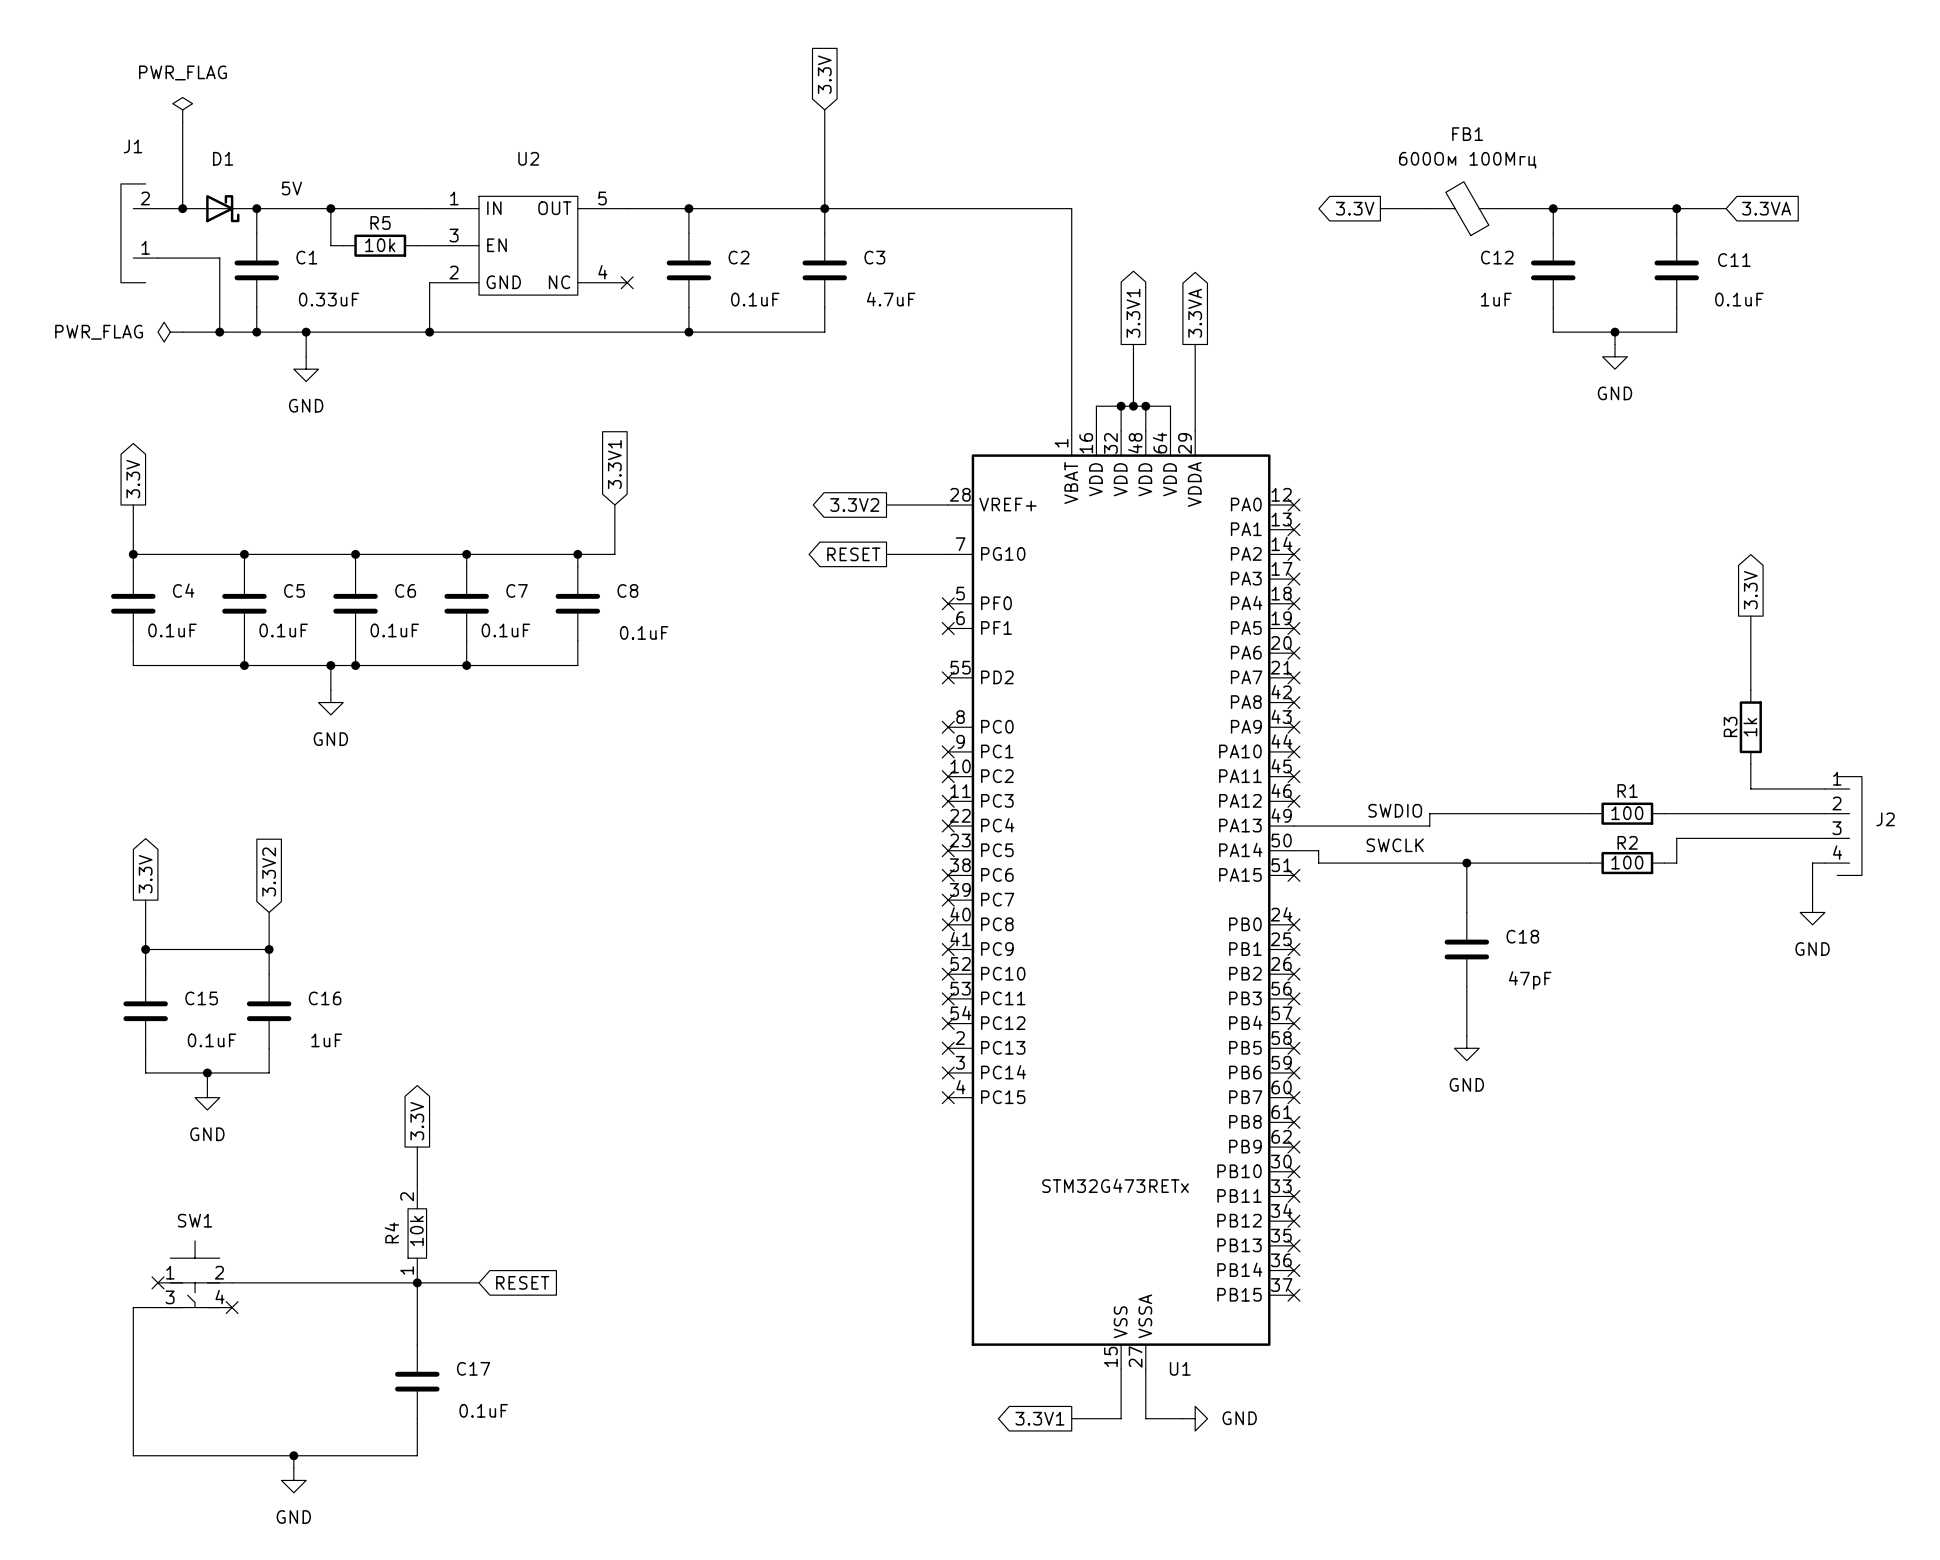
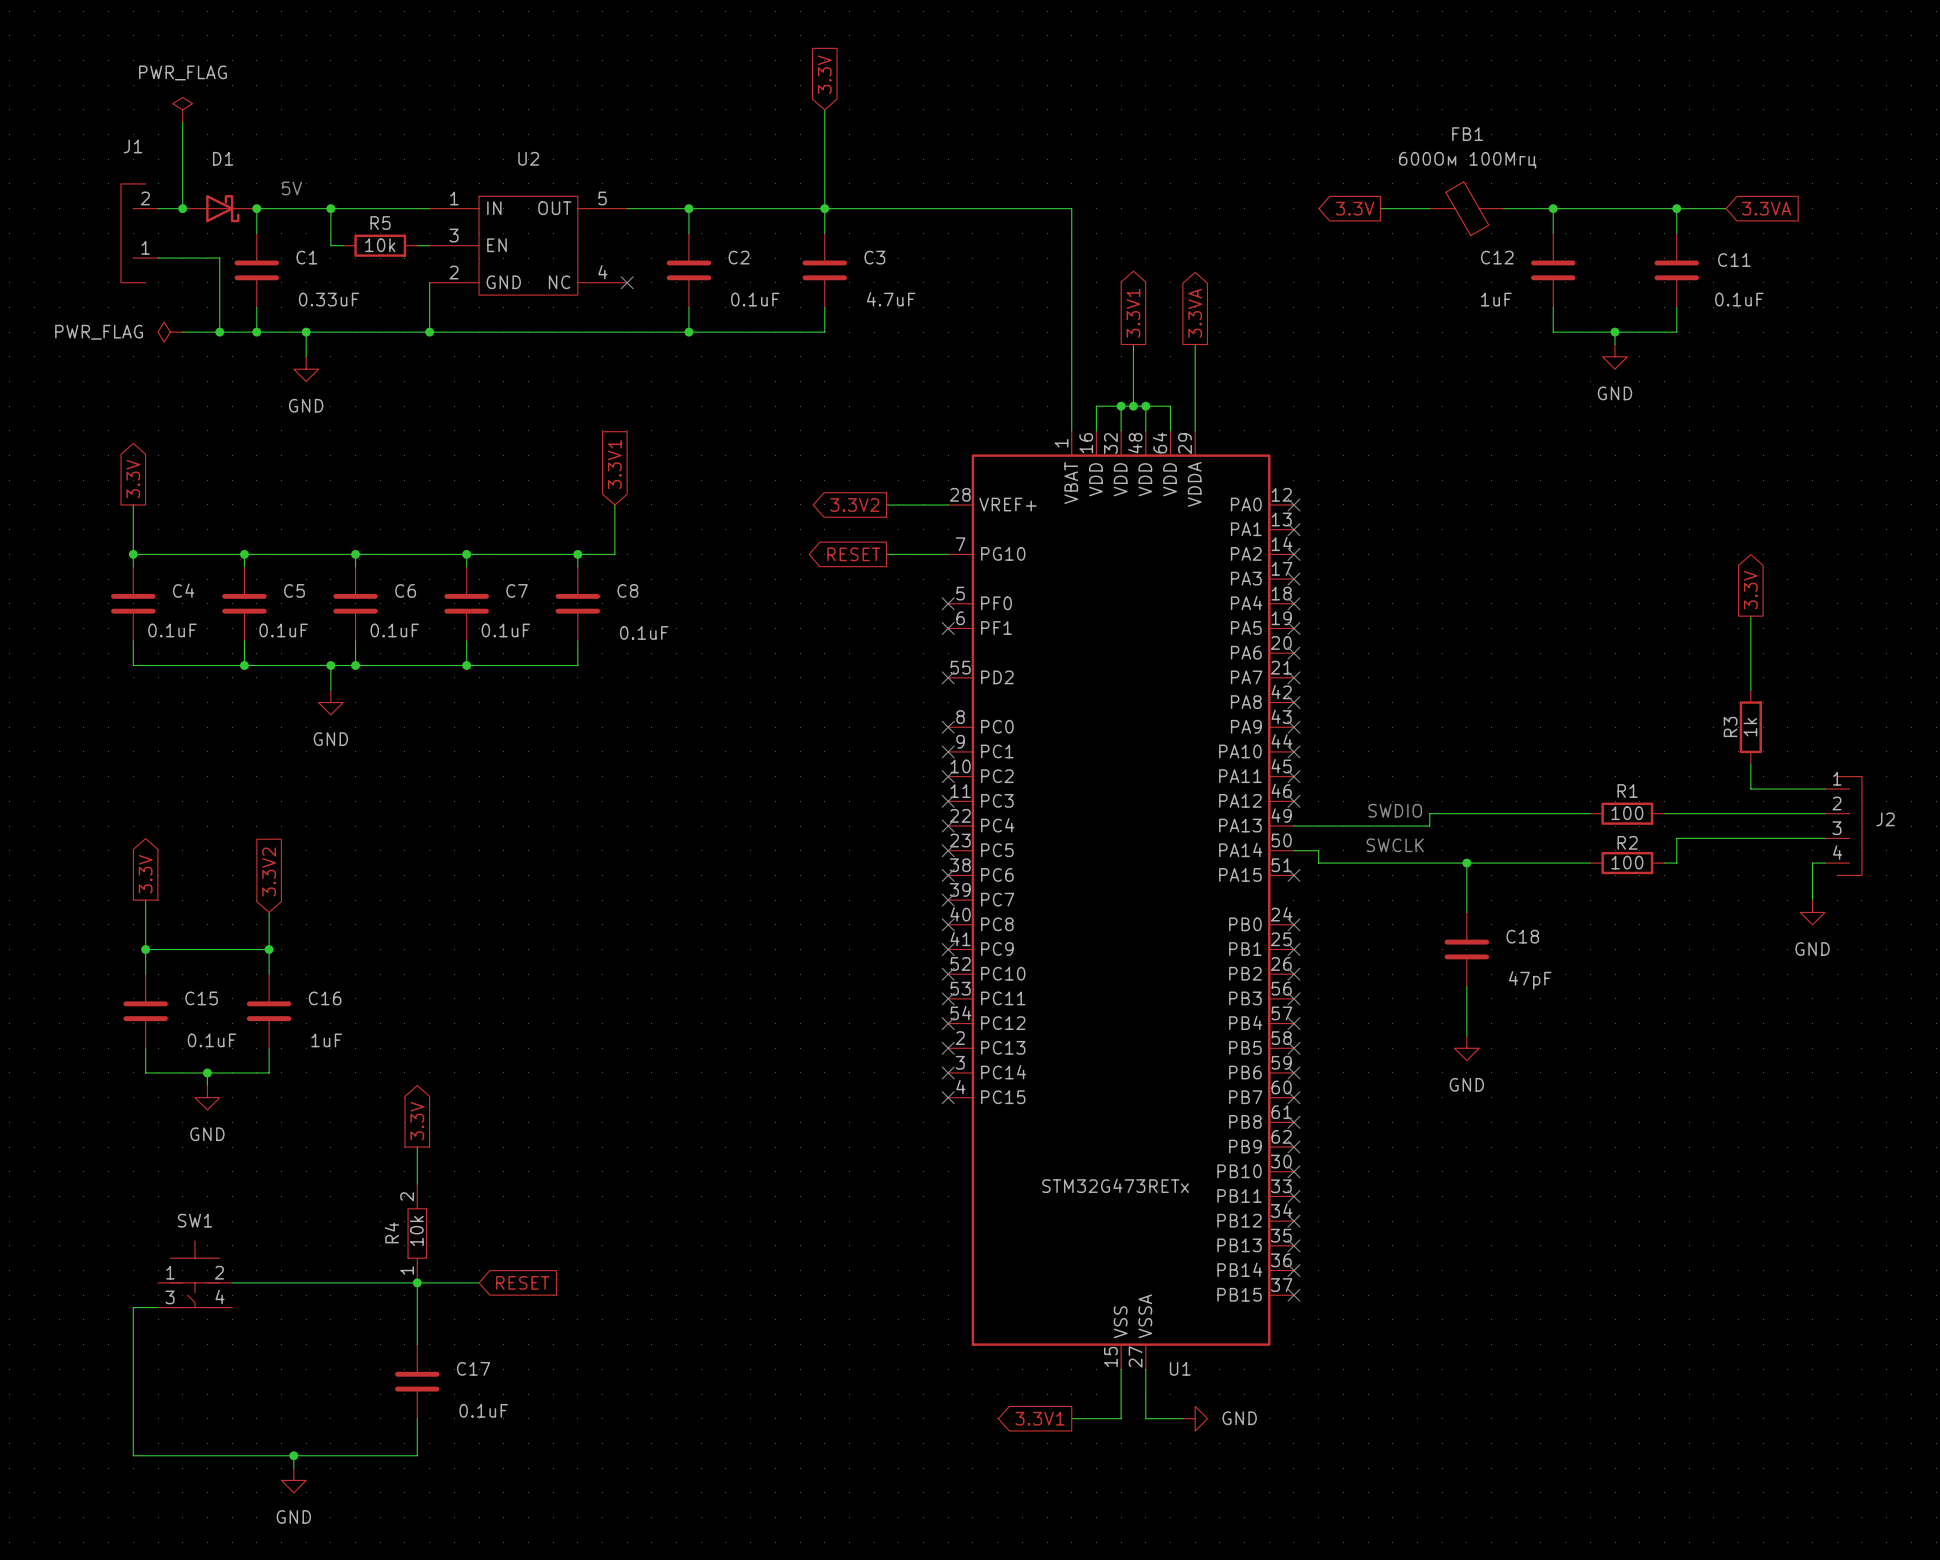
no-connect mark: (158, 1282) -> none
no-connect mark: (232, 1307) -> none

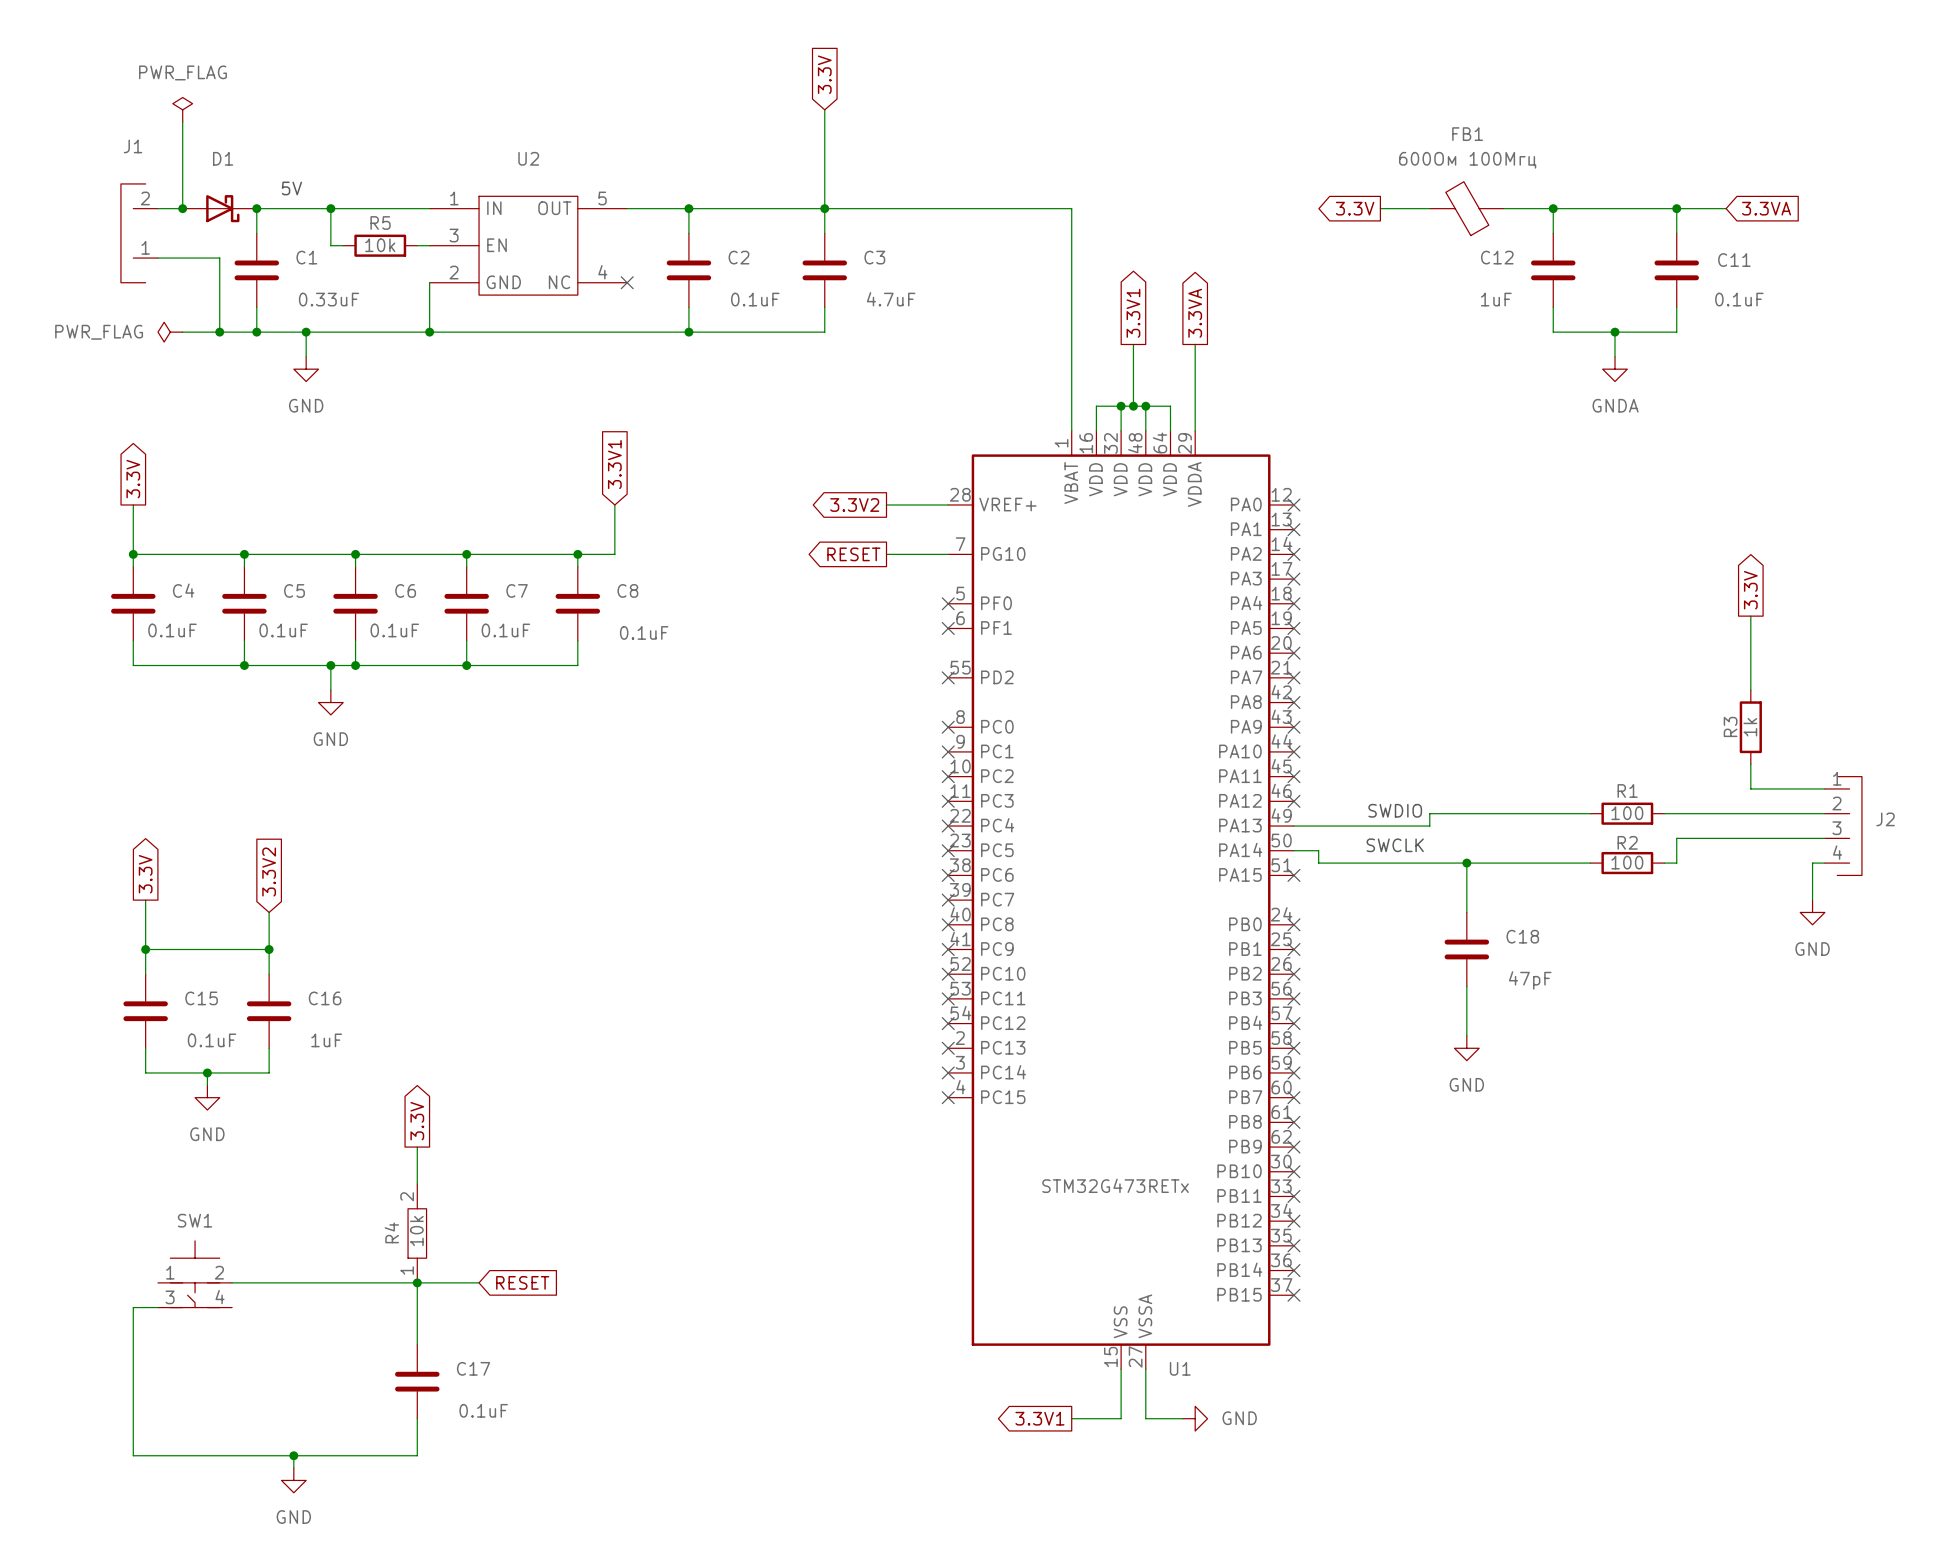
power symbol: GND (1615, 356) -> none
power symbol: none -> GNDA (1615, 369)

